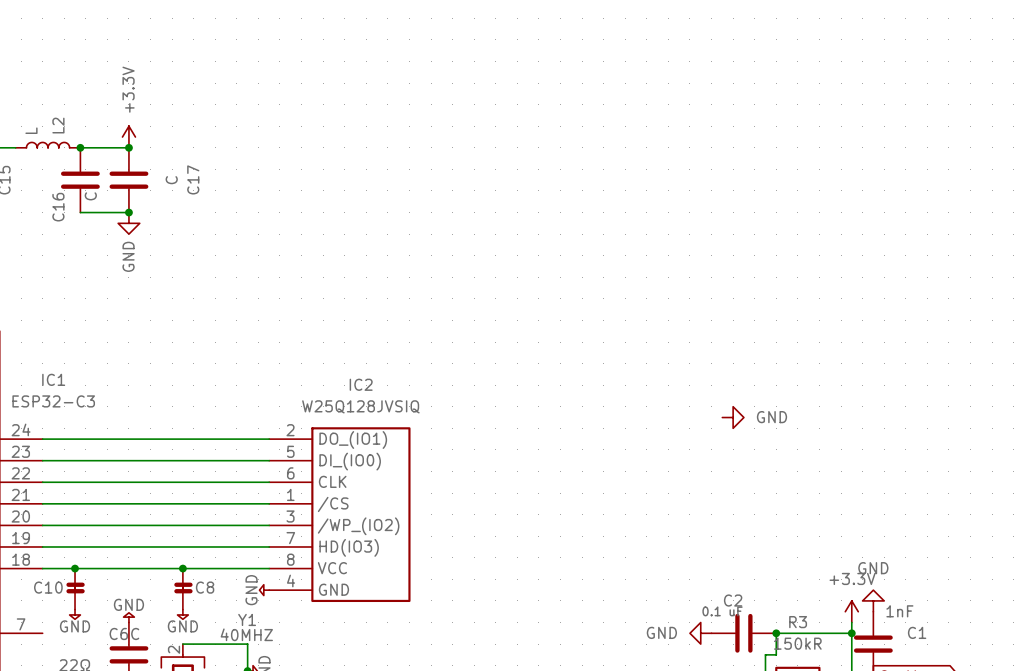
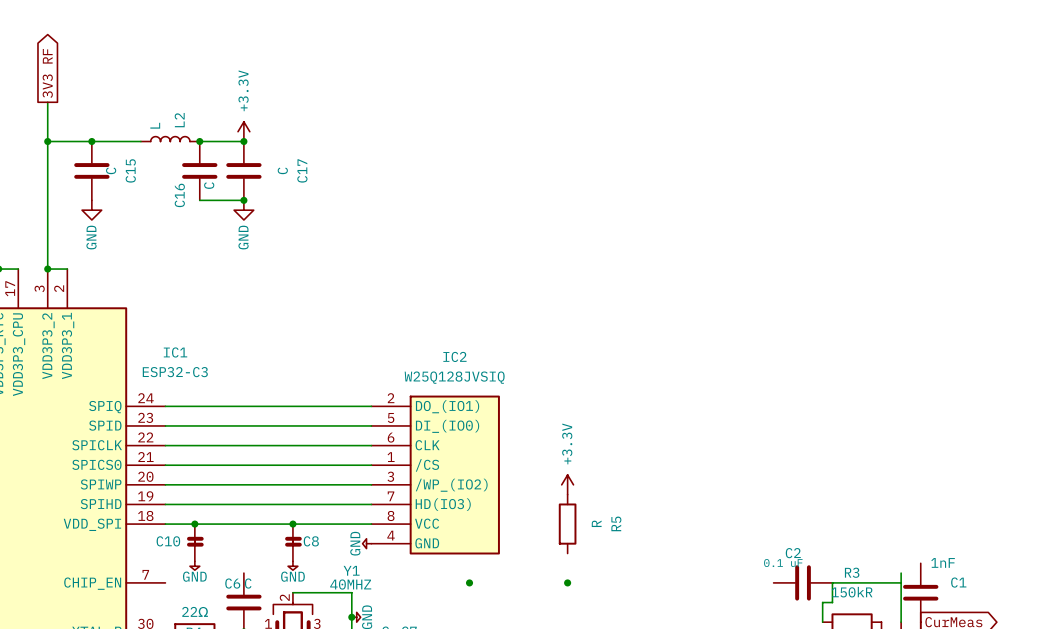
power symbol: GND (733, 417) -> none
power symbol: none -> +3.3V (567, 484)
R5: none -> R (567, 524)
power symbol: GND (873, 600) -> none
power symbol: +3.3V (851, 611) -> none
power symbol: GND (128, 617) -> none
junction: none -> (469, 582)
junction: none -> (567, 582)
power symbol: GND (700, 633) -> none
junction: (776, 633) -> none
junction: (851, 633) -> none

